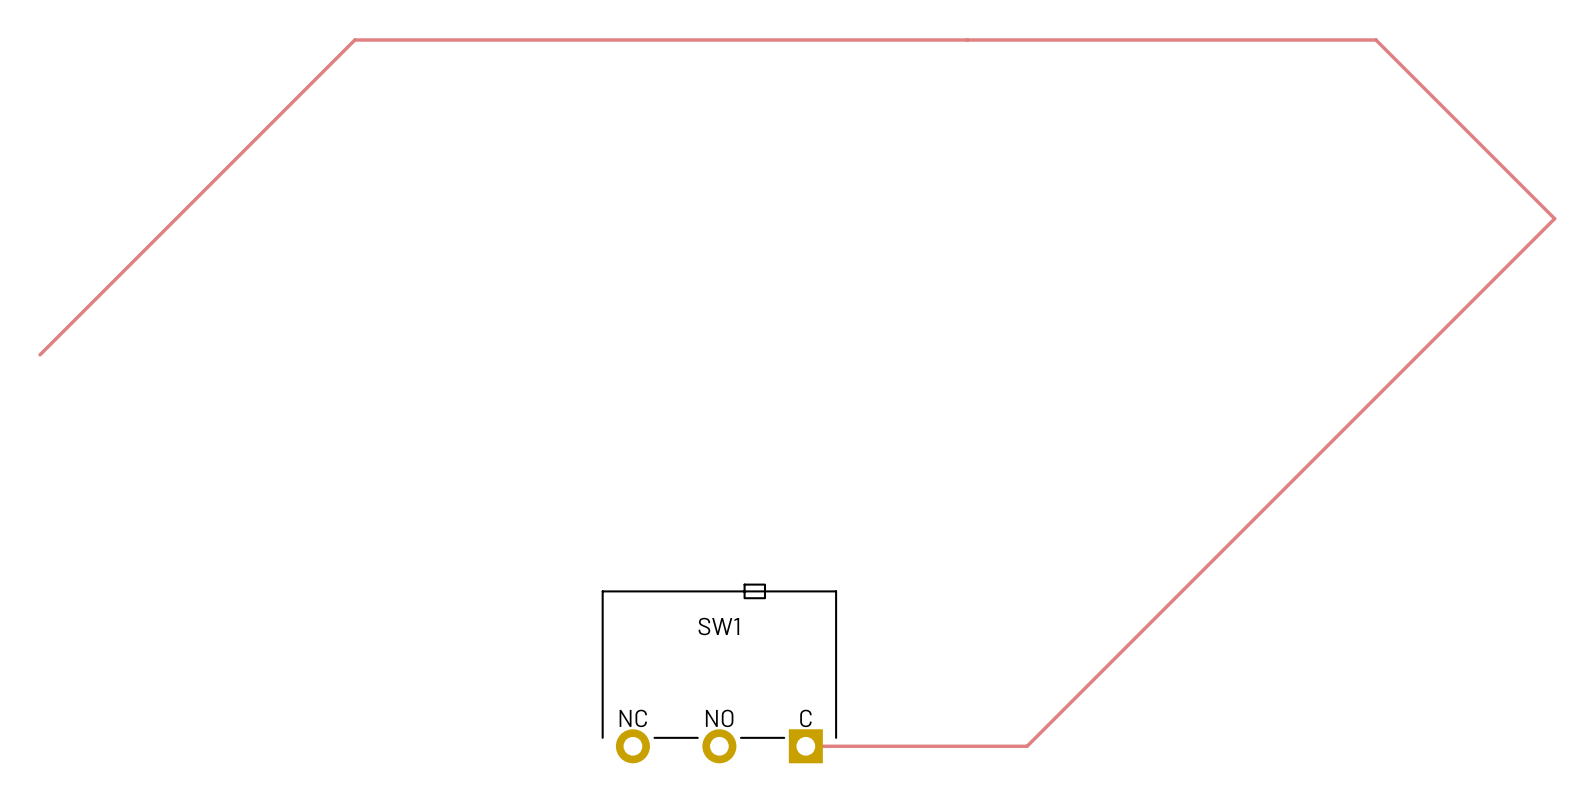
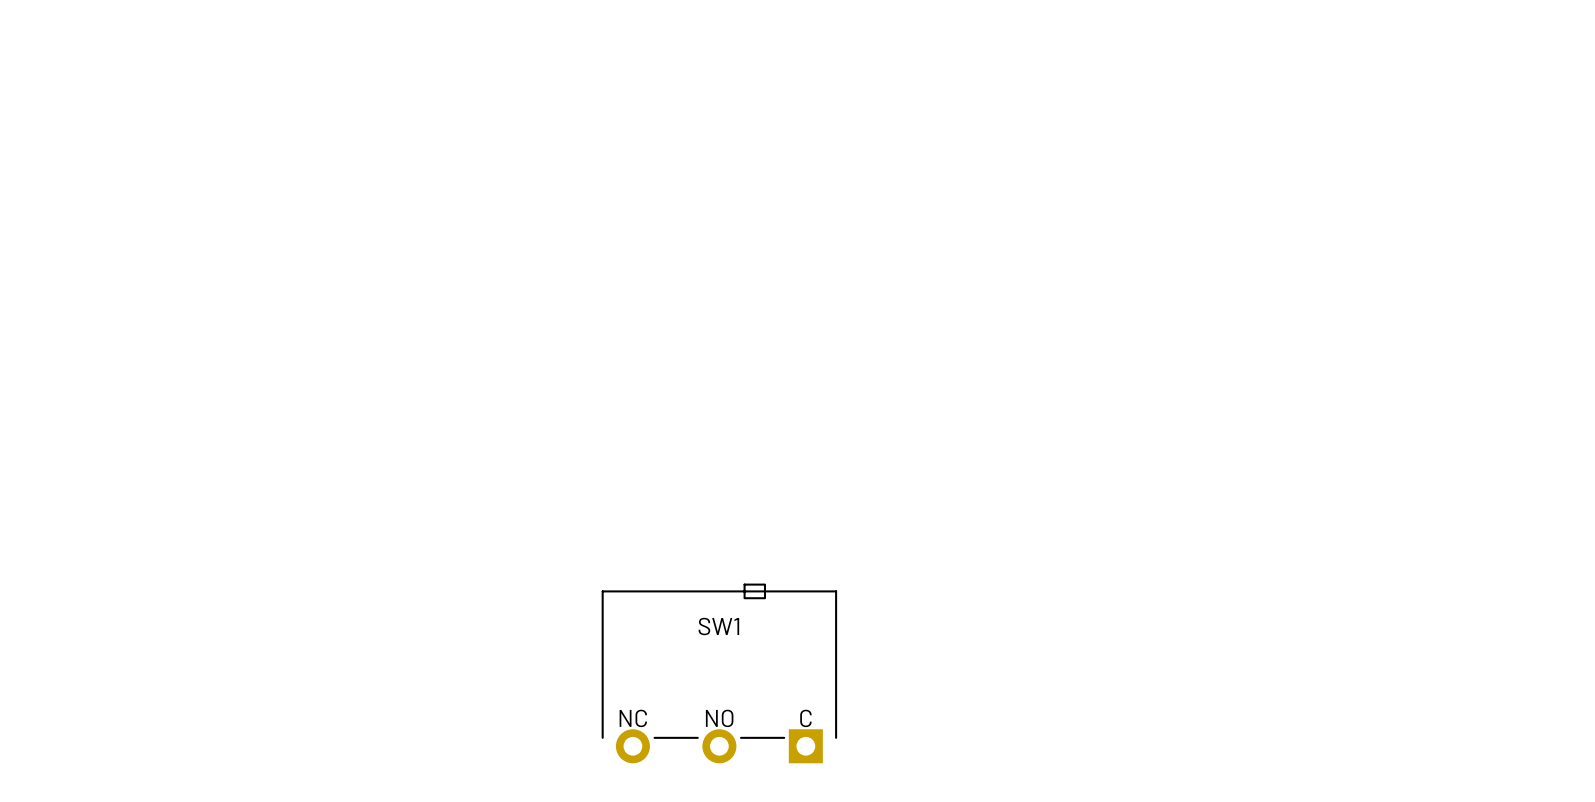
track: (40, 354) (354, 40) (1375, 40) (1554, 218) (1027, 746) (805, 746) -> none

